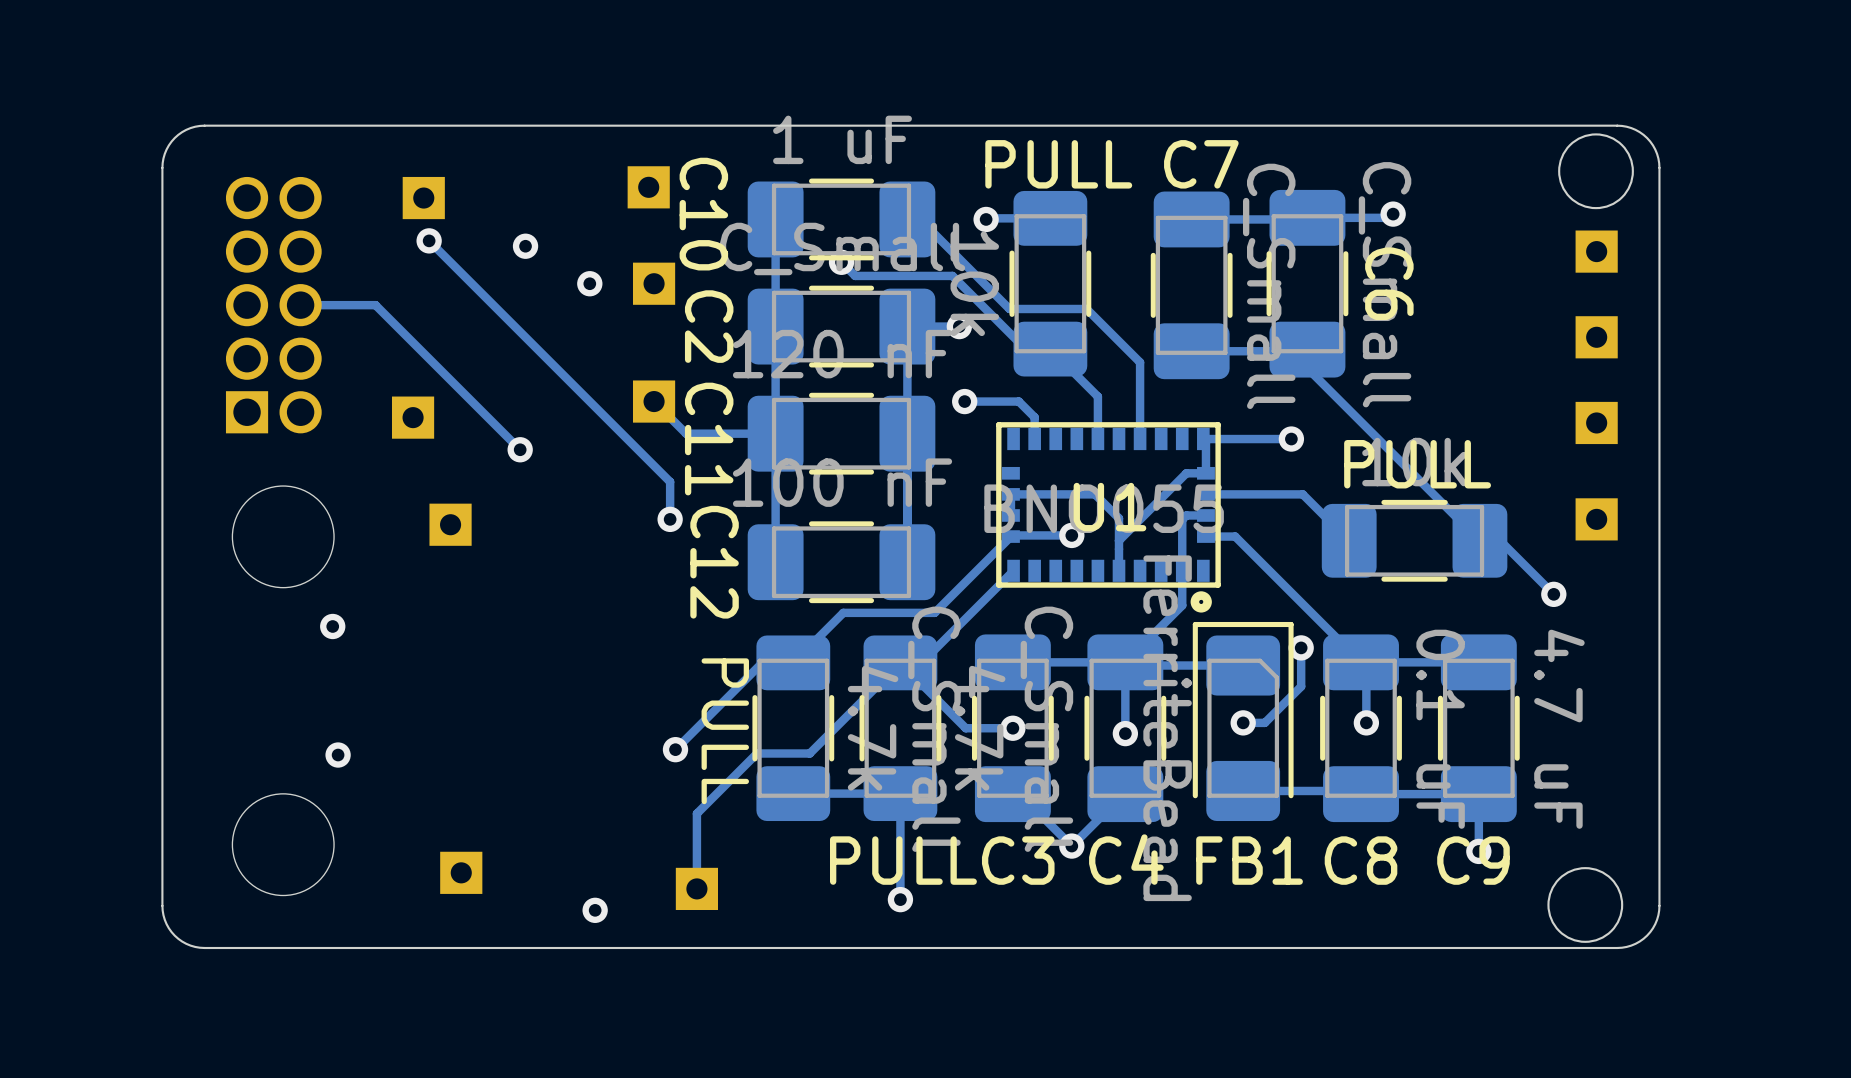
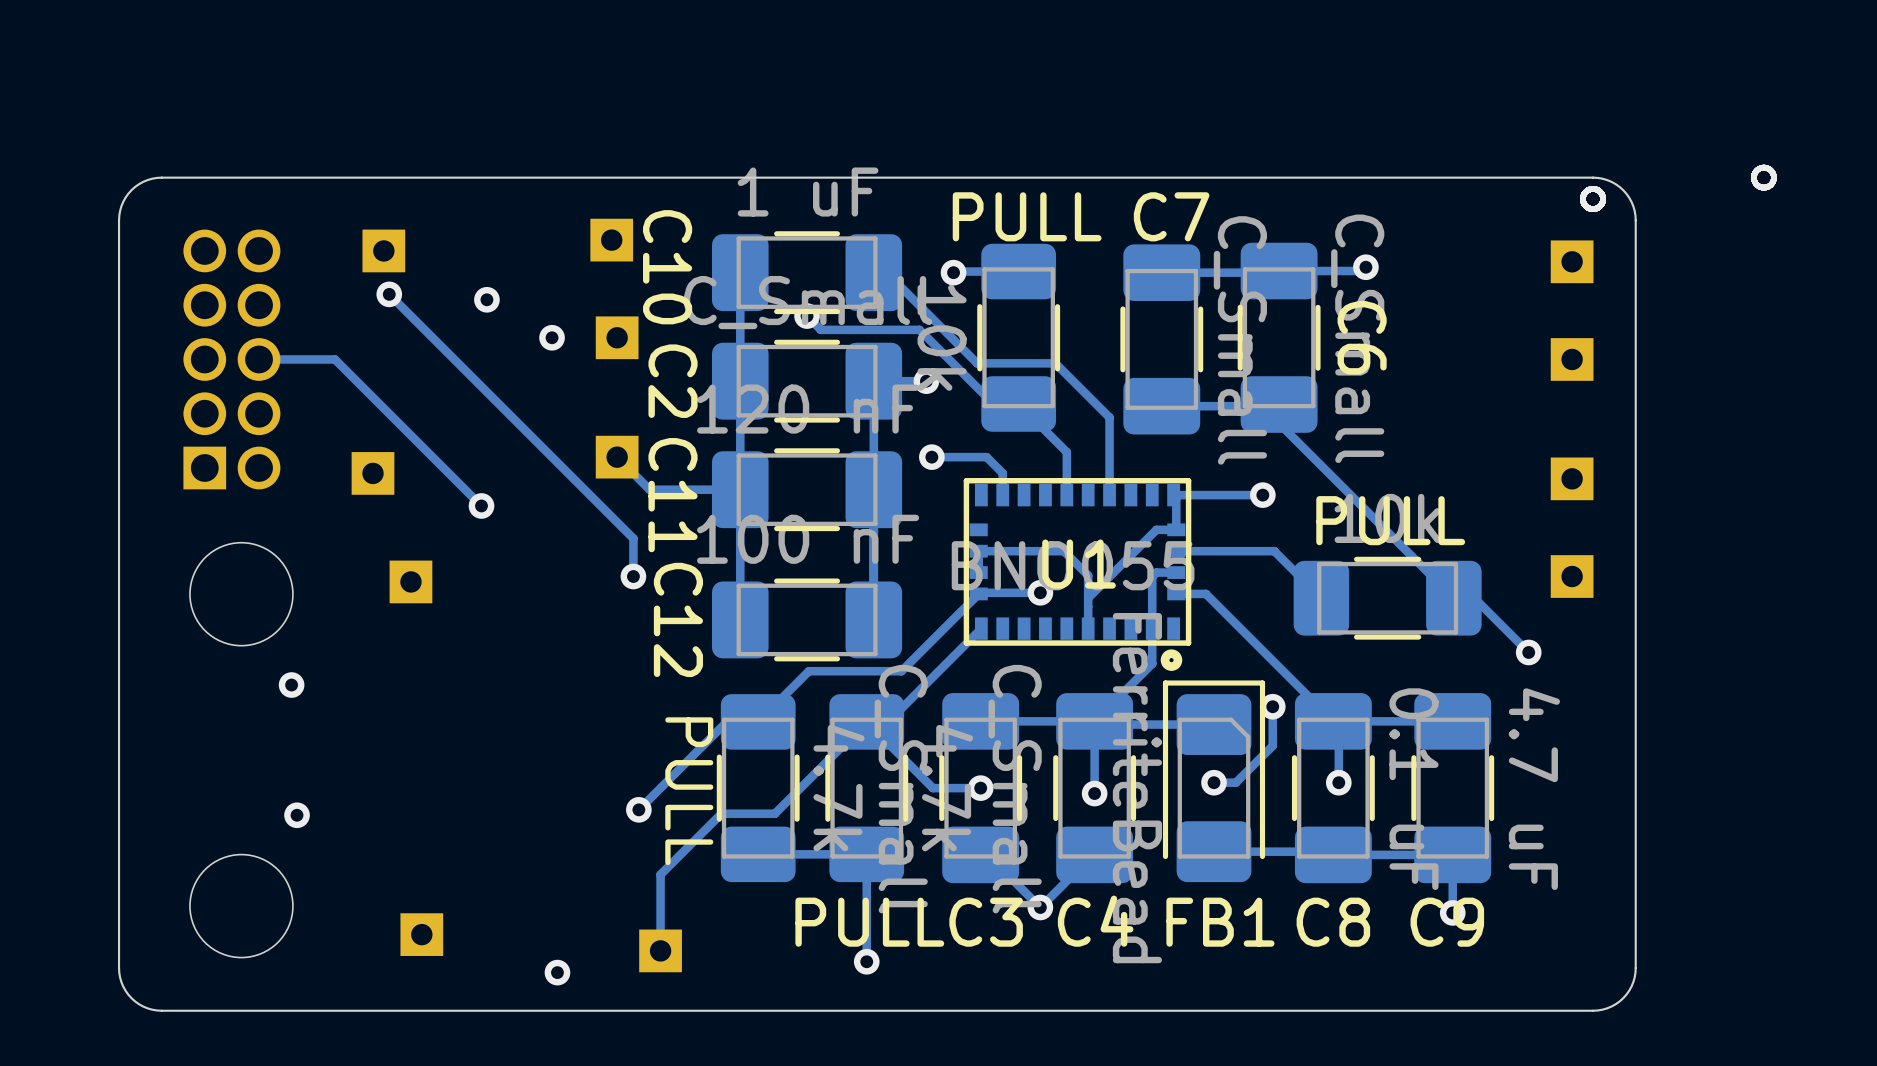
via: none -> (1763, 177)
round board edge: [1558, 133, 1634, 210] -> none
via: none -> (1593, 199)
part: none -> (1572, 261)
part: (1596, 251) -> none
part: none -> (1572, 359)
part: (1596, 337) -> none
round board edge: [1547, 867, 1624, 943] -> none

